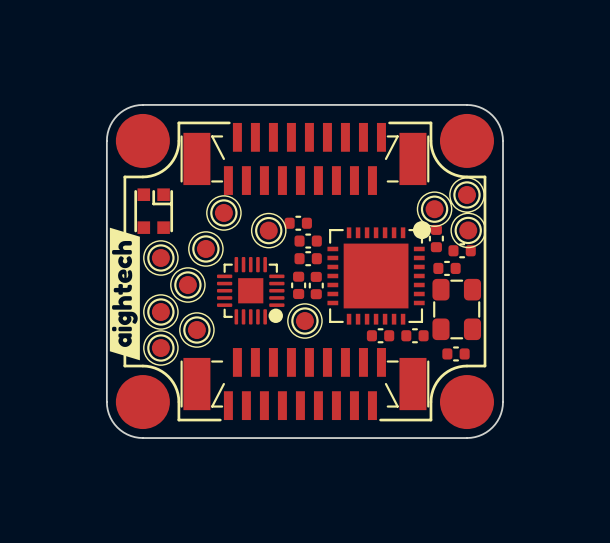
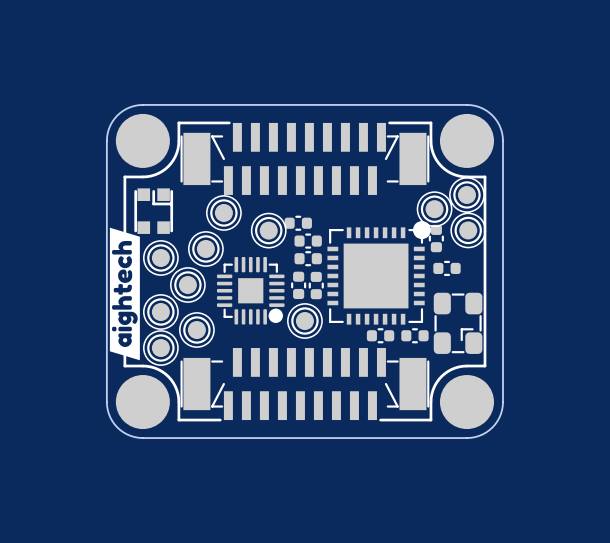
part: (462, 250) -> none
part footprint: [432, 278, 482, 341] -> [433, 292, 483, 354]
part: (456, 353) -> none

